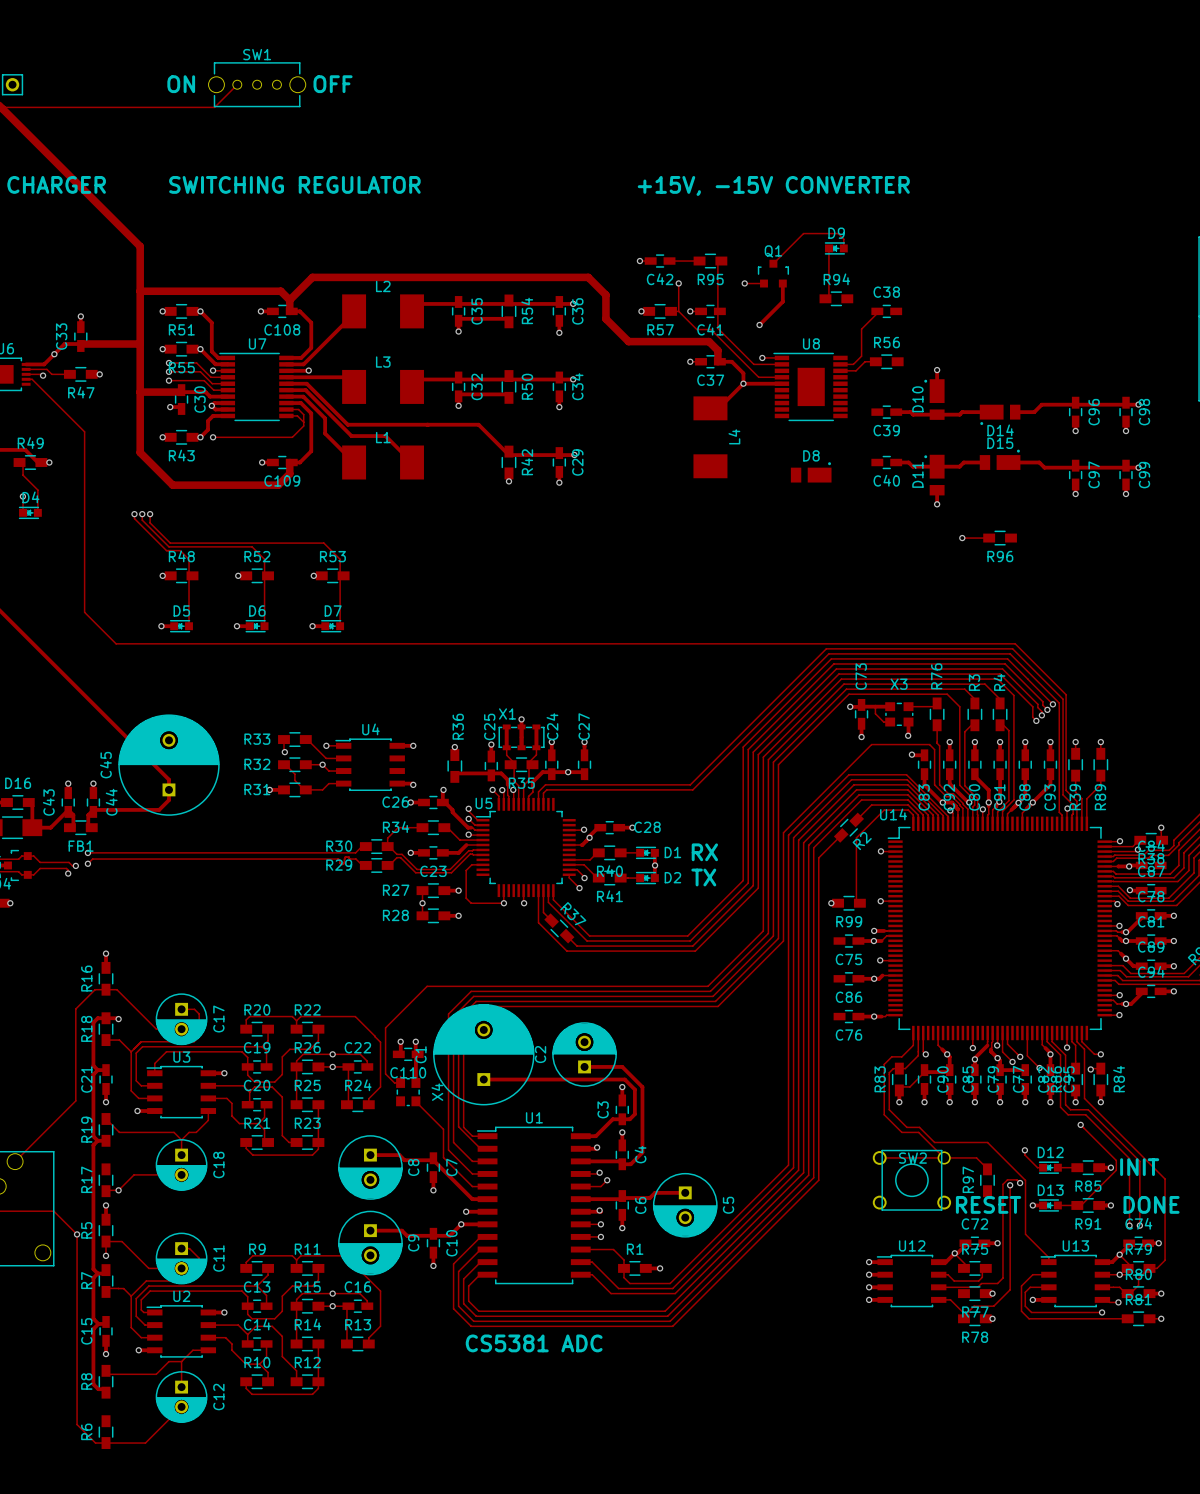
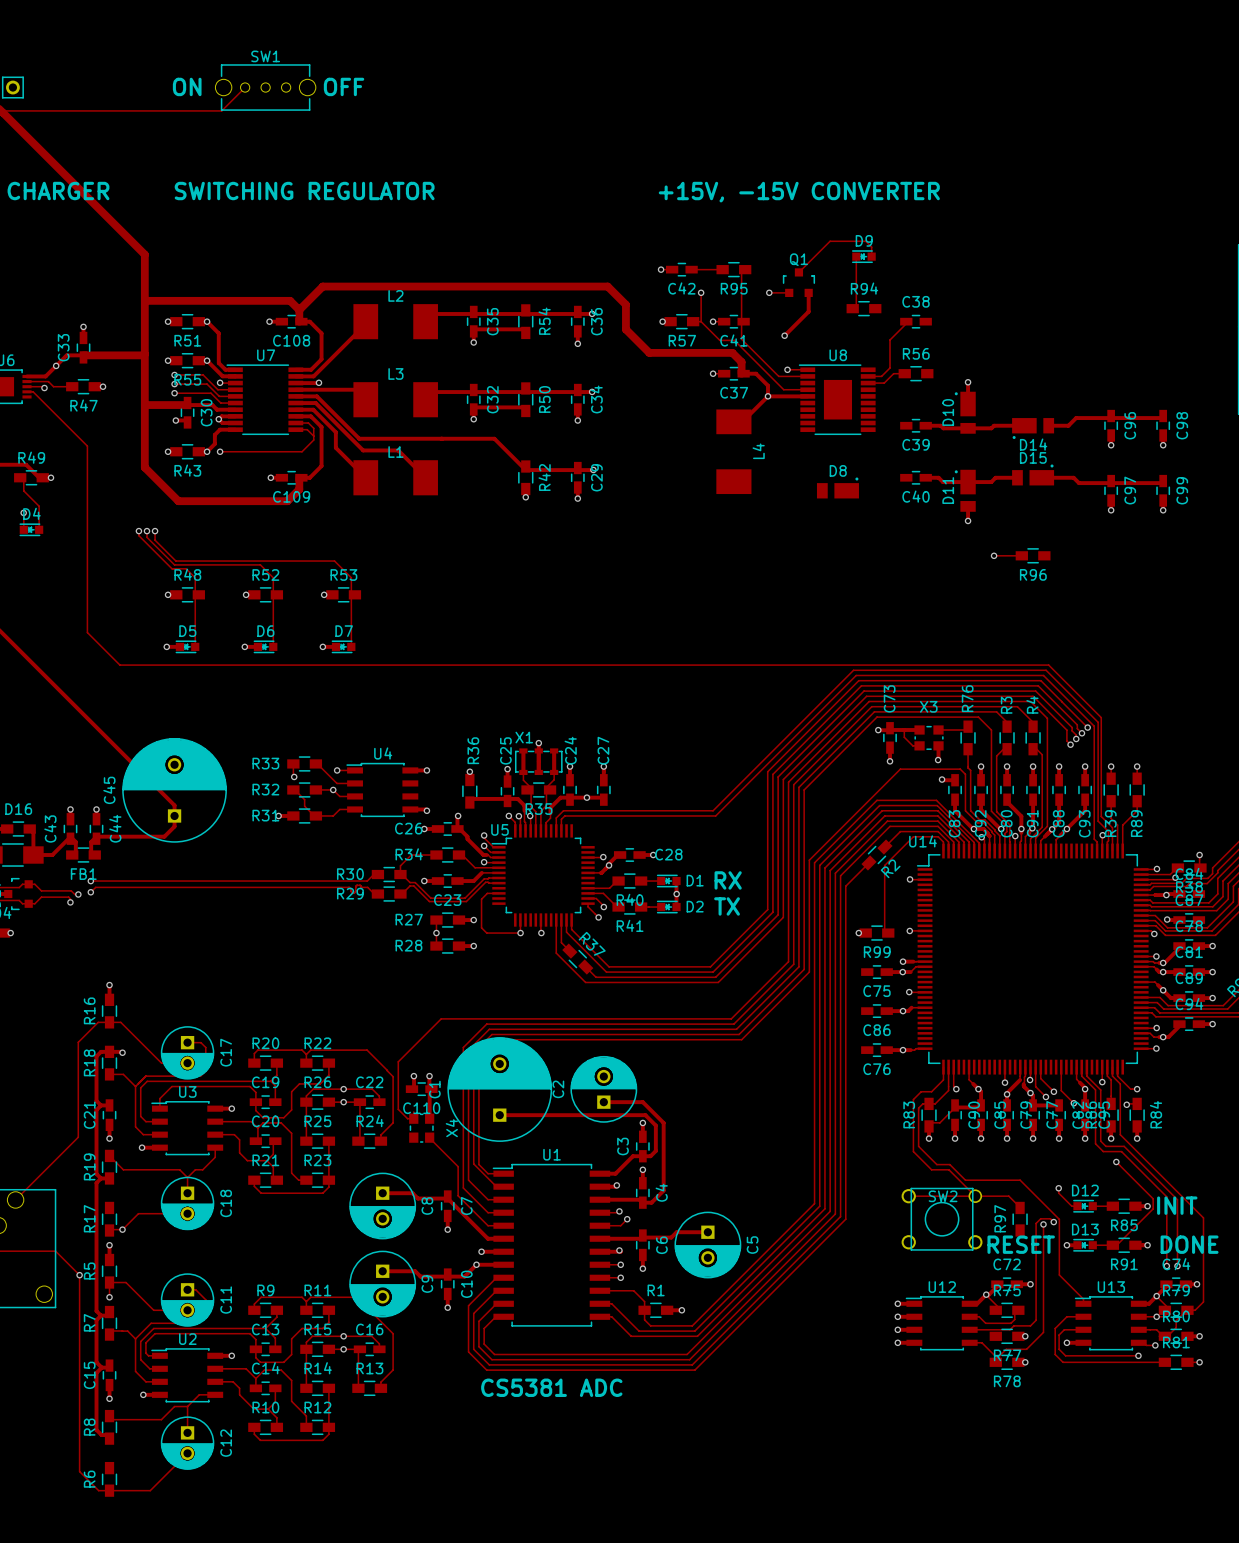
track: (1126, 404) (1138, 404) -> none
via: (1138, 404) -> none
track: (1126, 467) (1138, 467) -> none
via: (1138, 467) -> none

